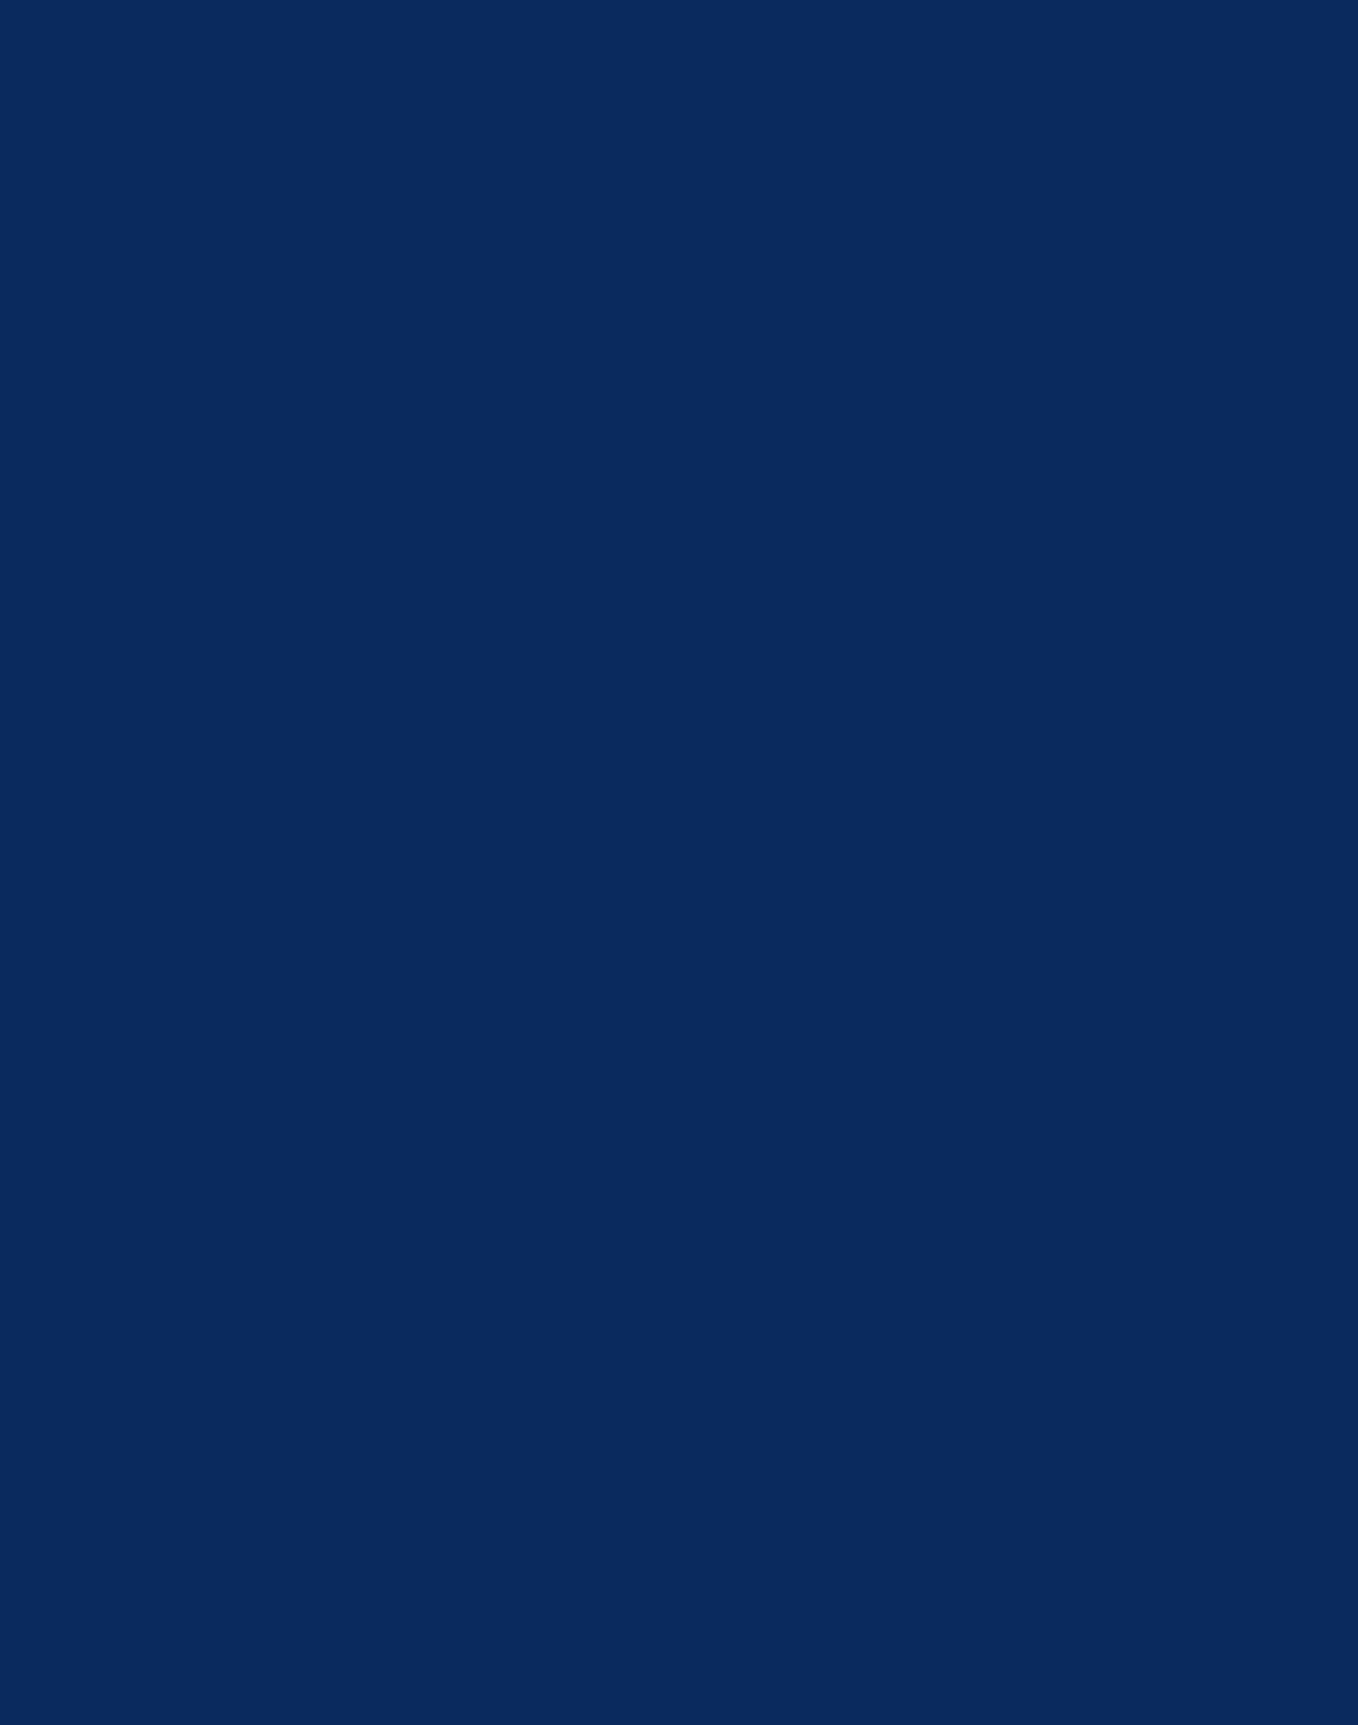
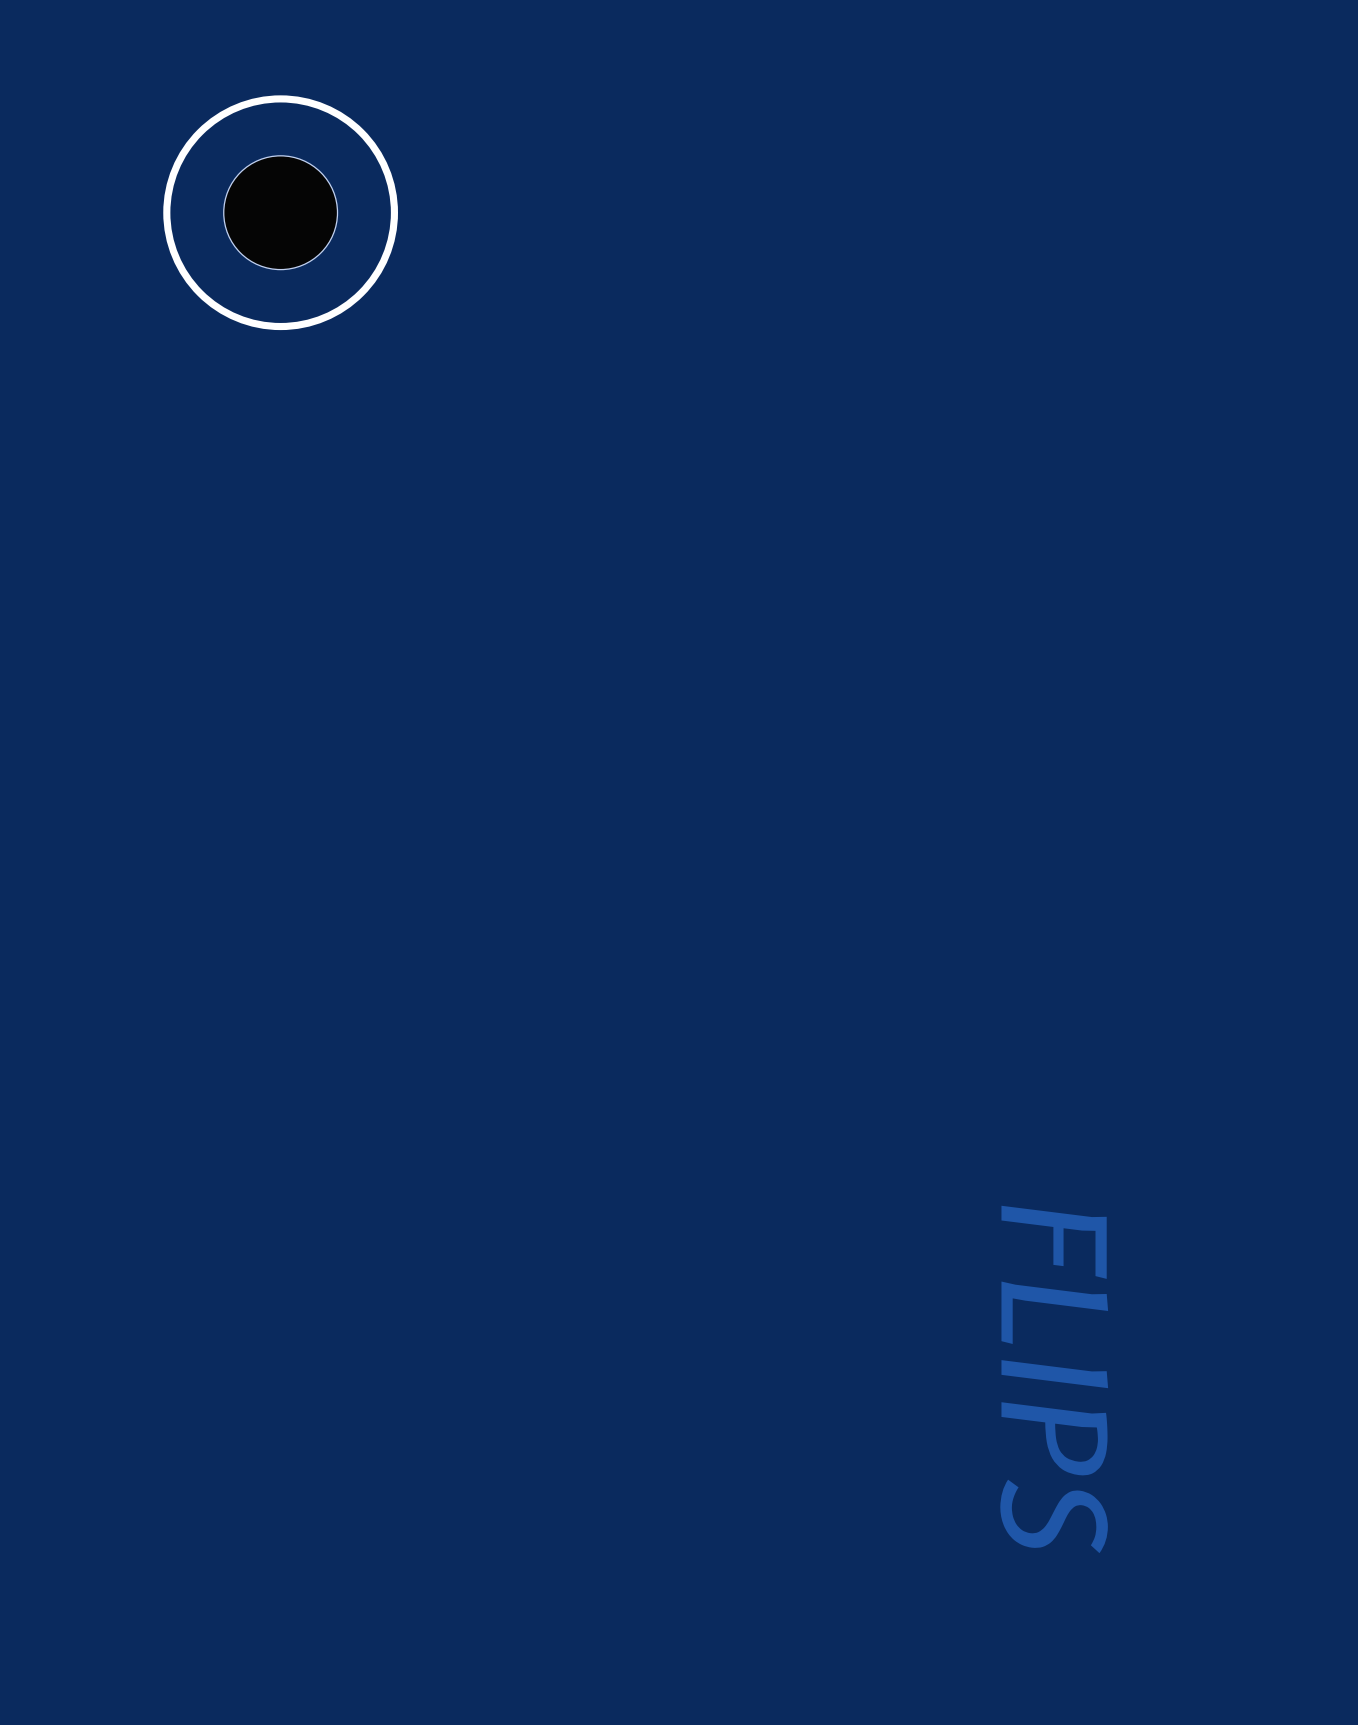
drawing: none -> [163, 95, 398, 331]
part: none -> (280, 212)
text: none -> FLIPS (1054, 1379)

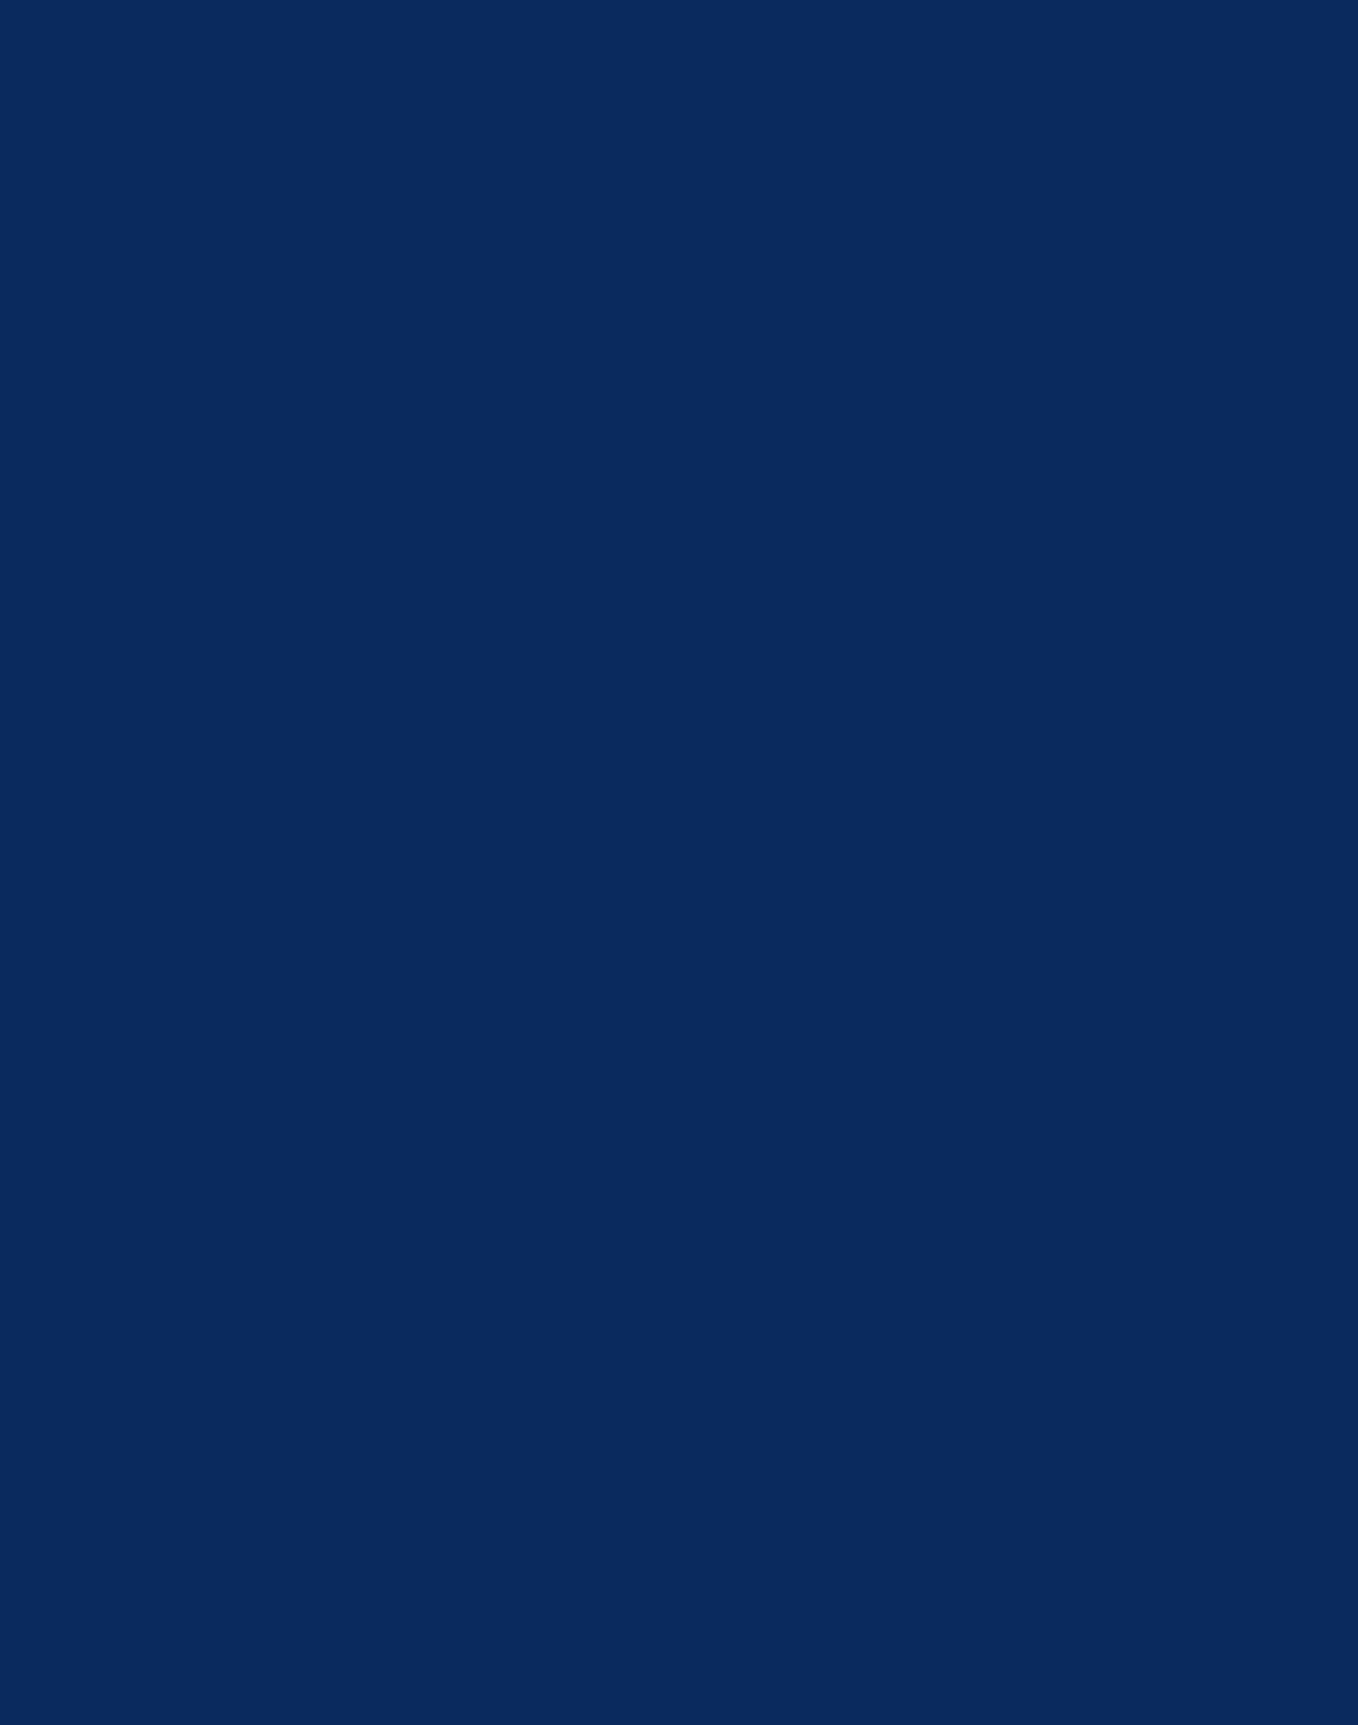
drawing: [163, 95, 398, 331] -> none
part: (280, 212) -> none
text: FLIPS (1054, 1379) -> none

